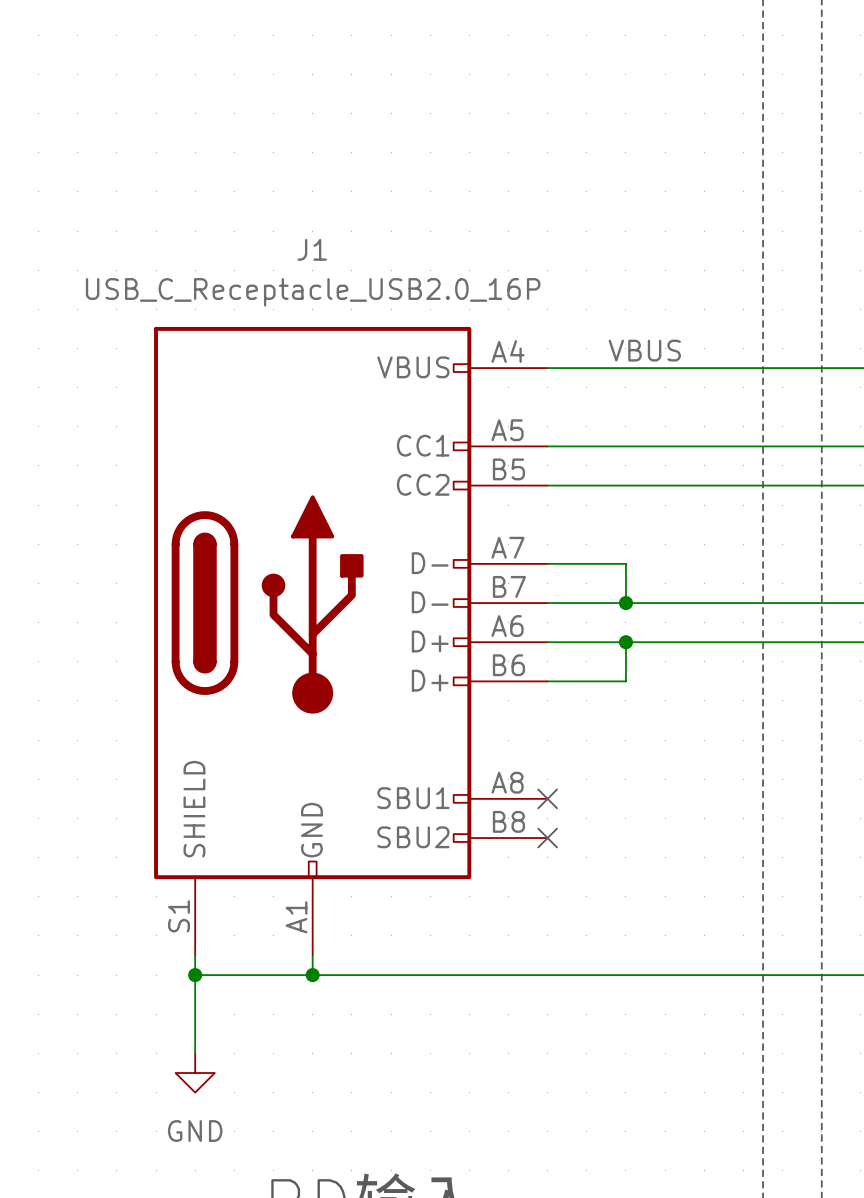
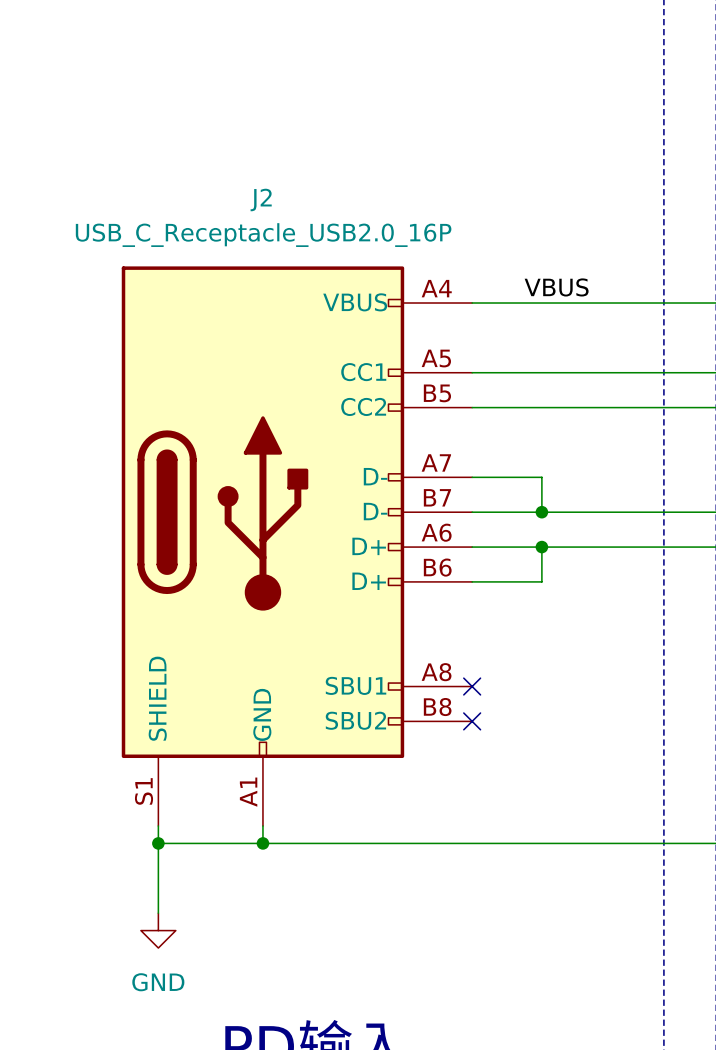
J1 name: J1 (312, 249) -> J2 (261, 199)

